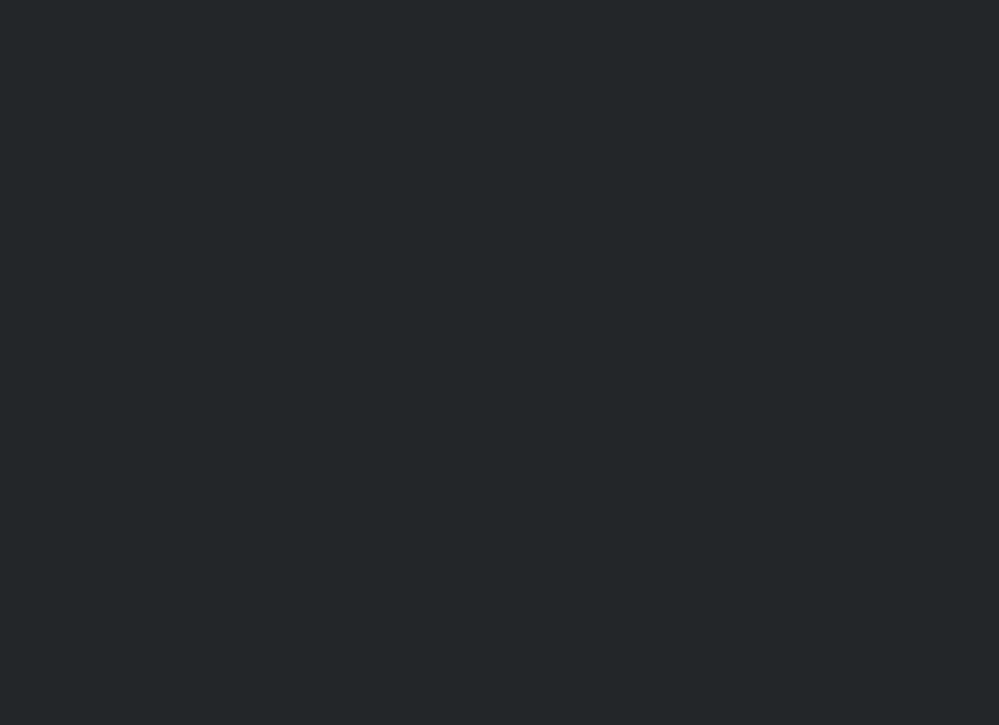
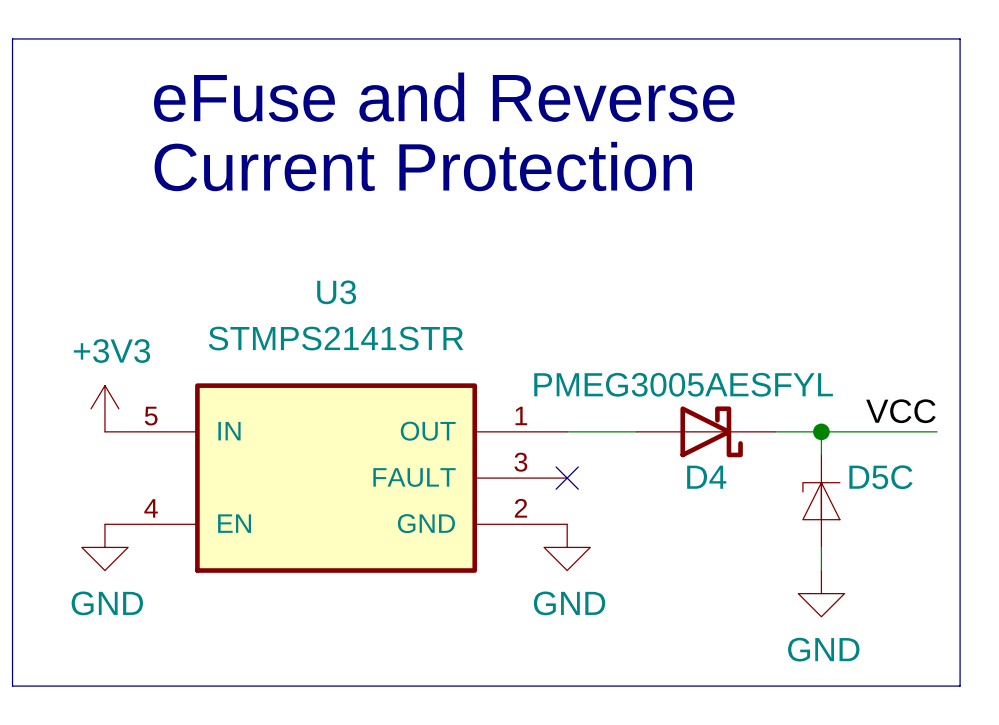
line: none -> (12, 38) (960, 38) (960, 686) (12, 686) (12, 38)
text: none -> eFuse and Reverse (444, 97)
text: none -> Current Protection (423, 166)
power symbol: none -> +3V3 (104, 408)
label: none -> VCC (900, 411)
wire: none -> (567, 431) (636, 431)
D4: none -> PMEG3005AESFYL (705, 431)
wire: none -> (775, 431) (936, 431)
wire: none -> (821, 431) (821, 454)
junction: none -> (821, 431)
U3: none -> STMPS2141STR (336, 478)
no-connect mark: none -> (567, 478)
D5C: none -> (821, 501)
power symbol: none -> GND (104, 547)
power symbol: none -> GND (567, 547)
wire: none -> (821, 547) (821, 570)
power symbol: none -> GND (821, 593)

